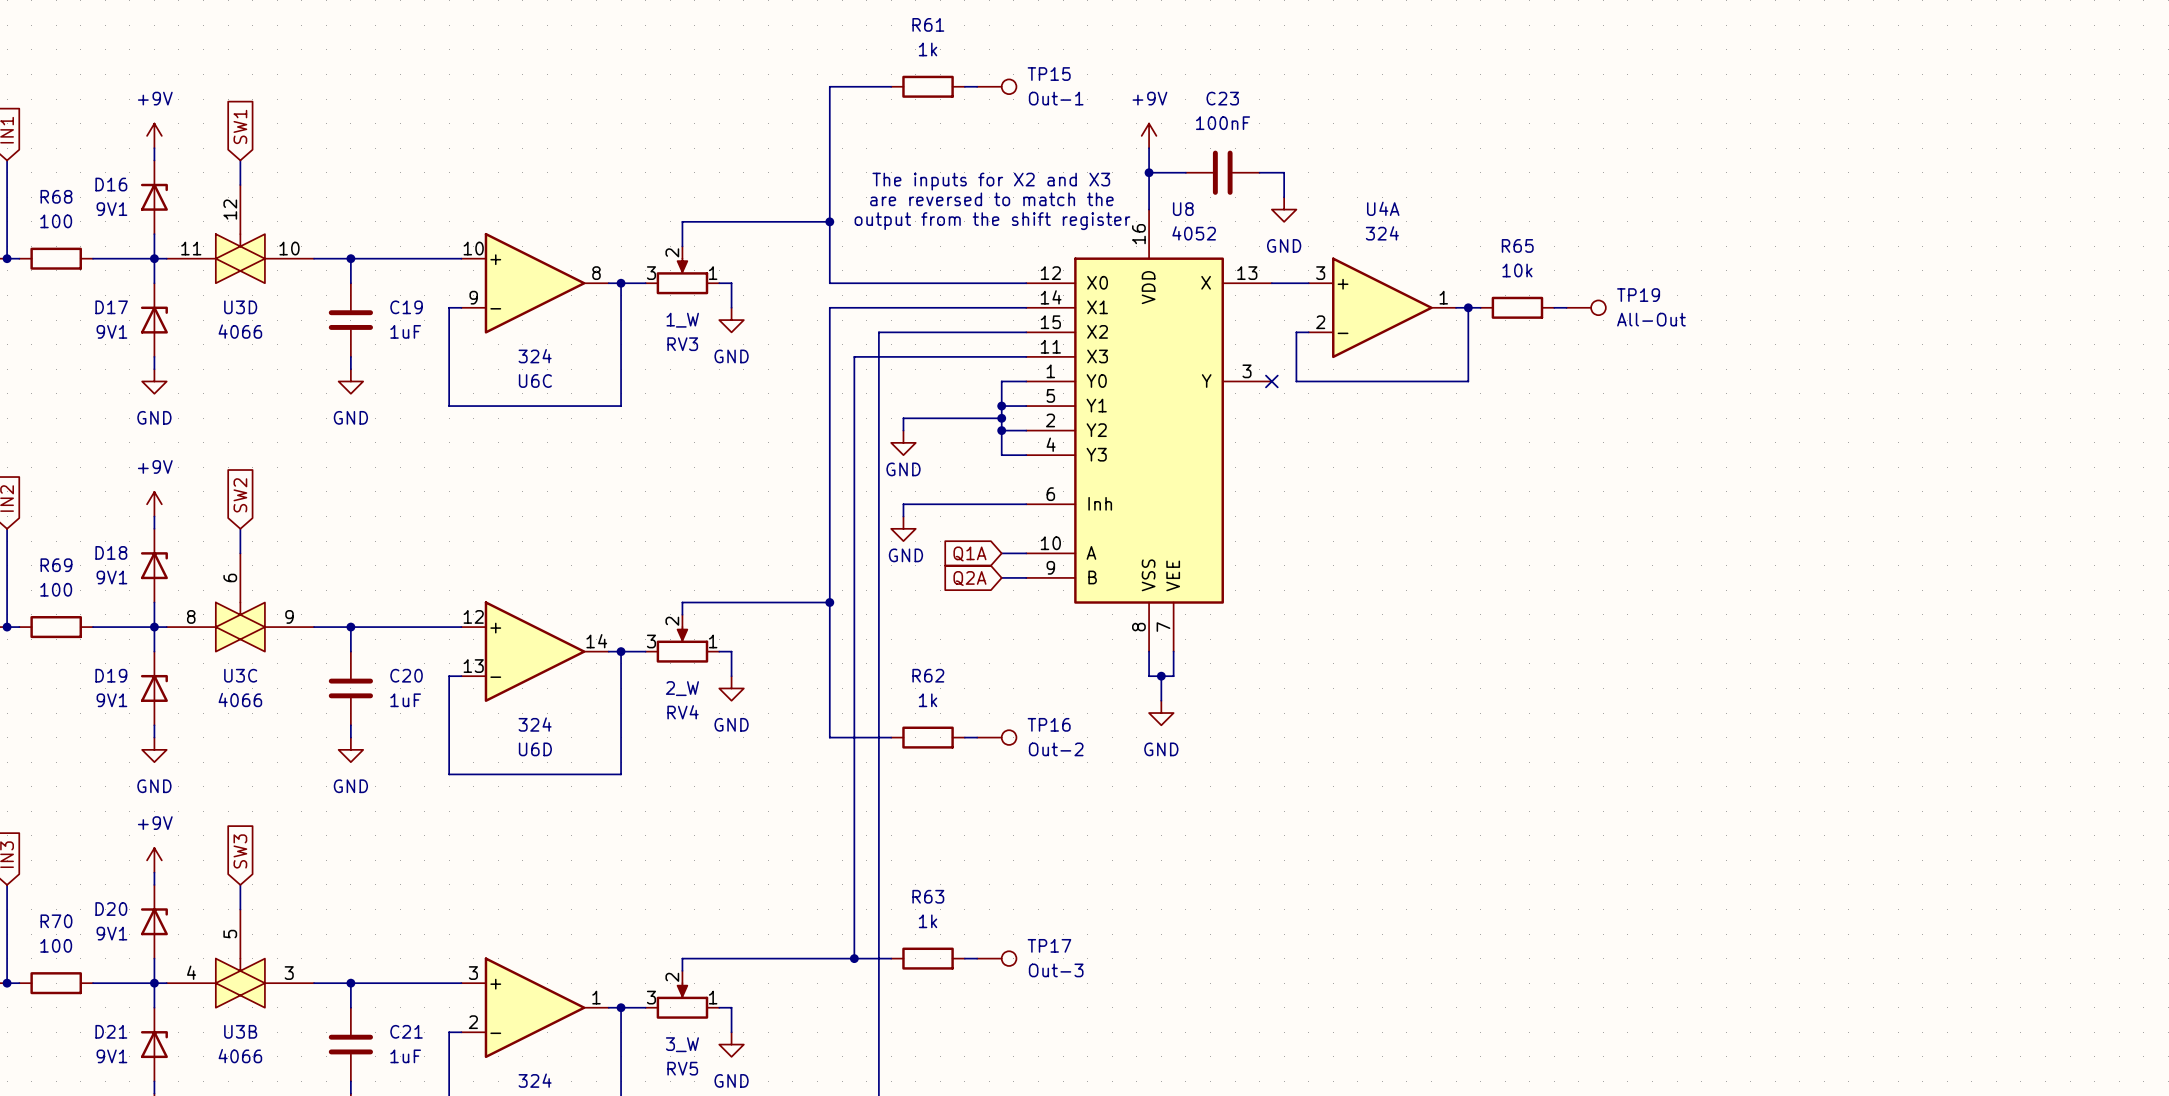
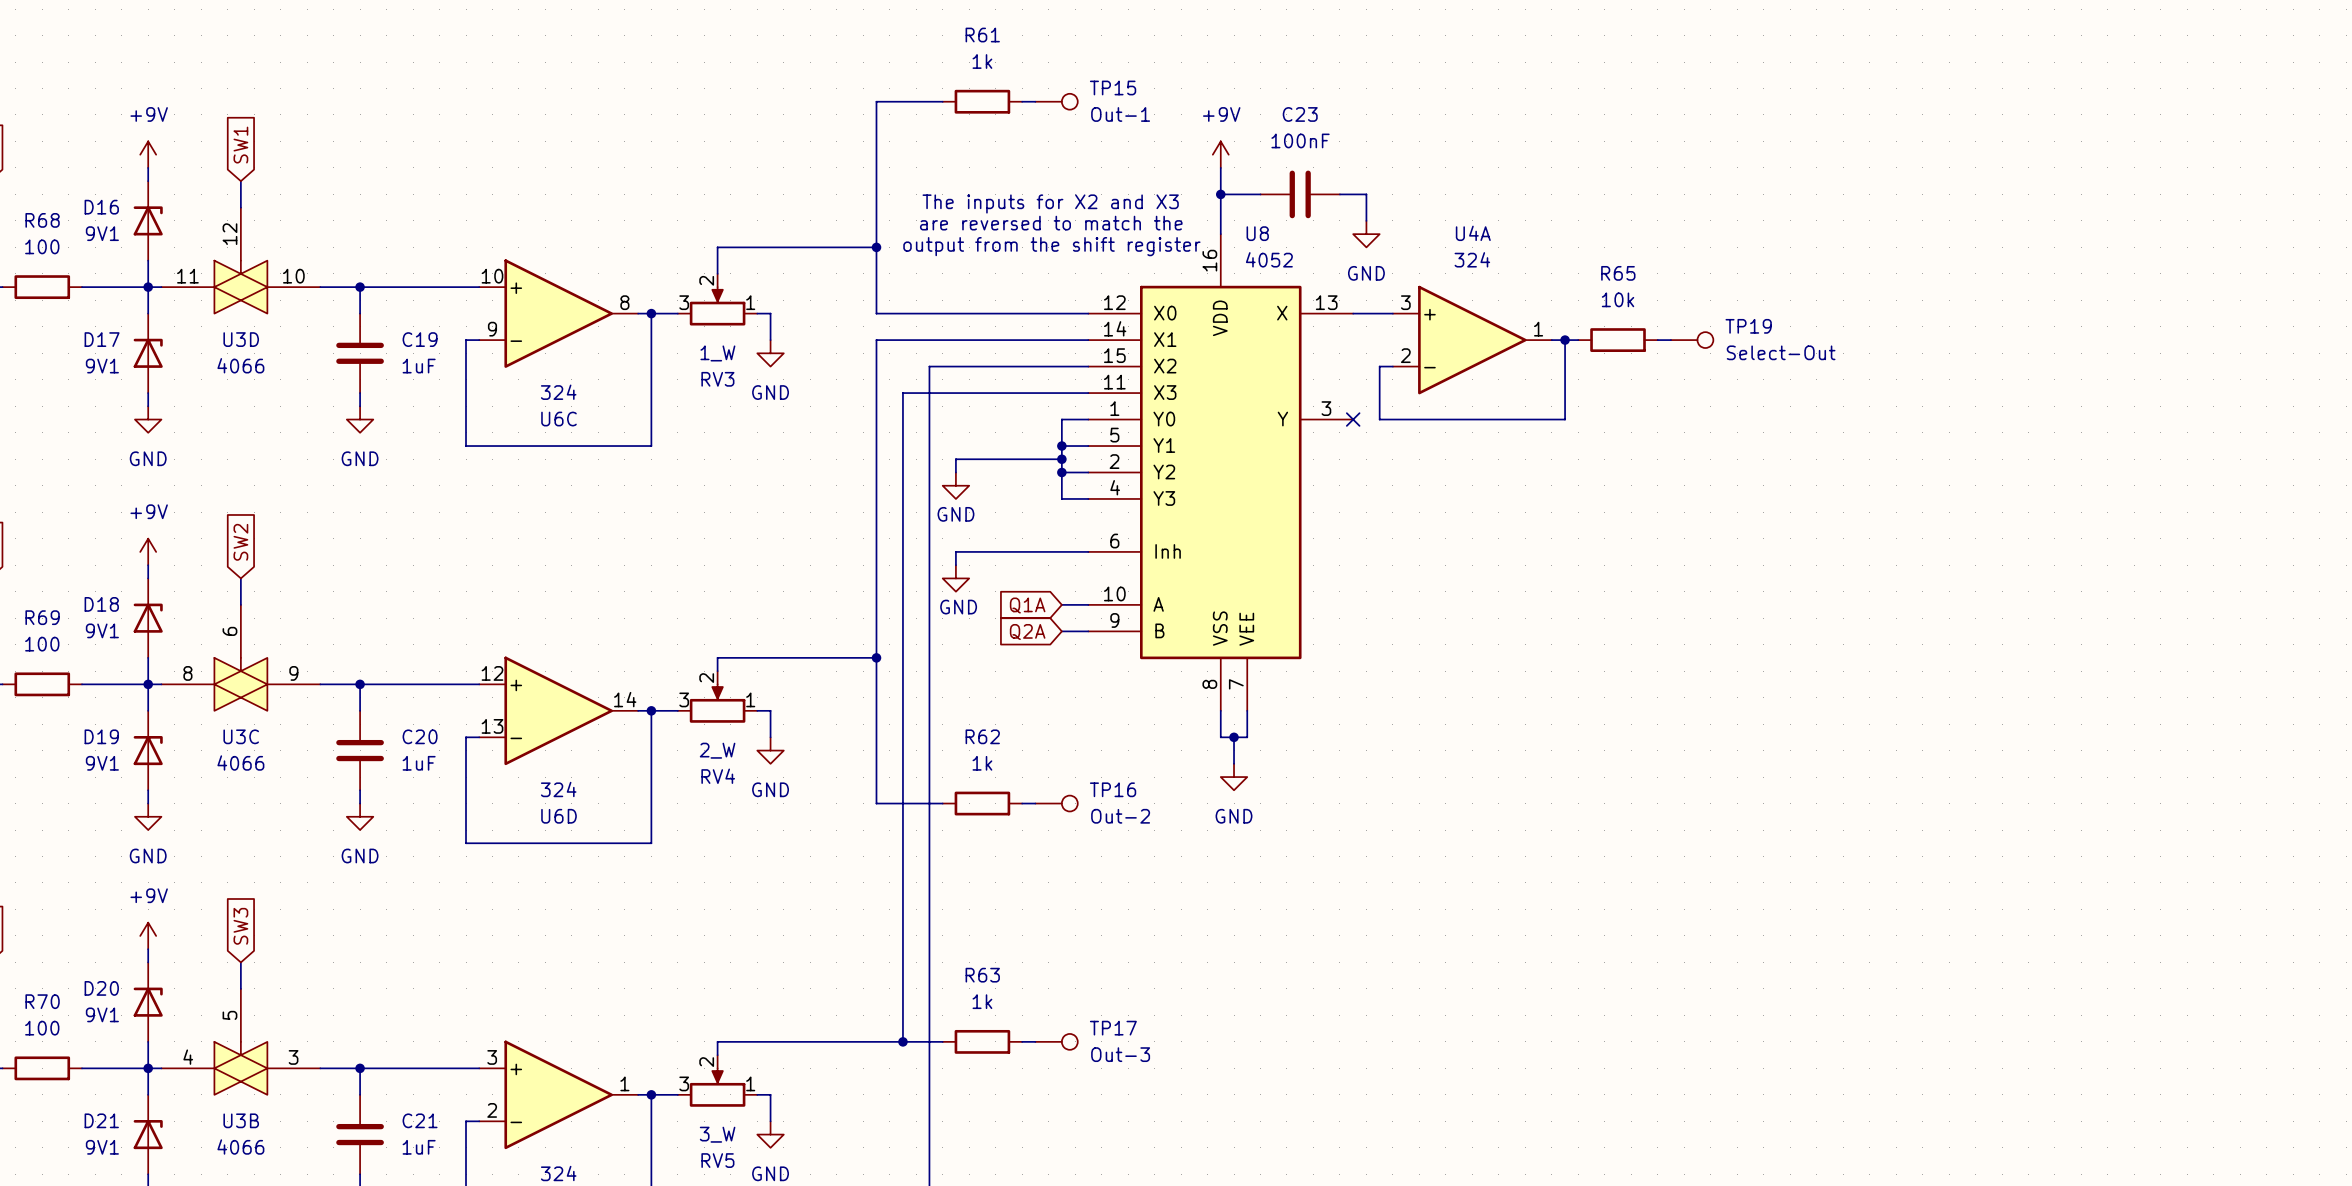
TP19 value: All-Out (1651, 319) -> Select-Out (1781, 352)

